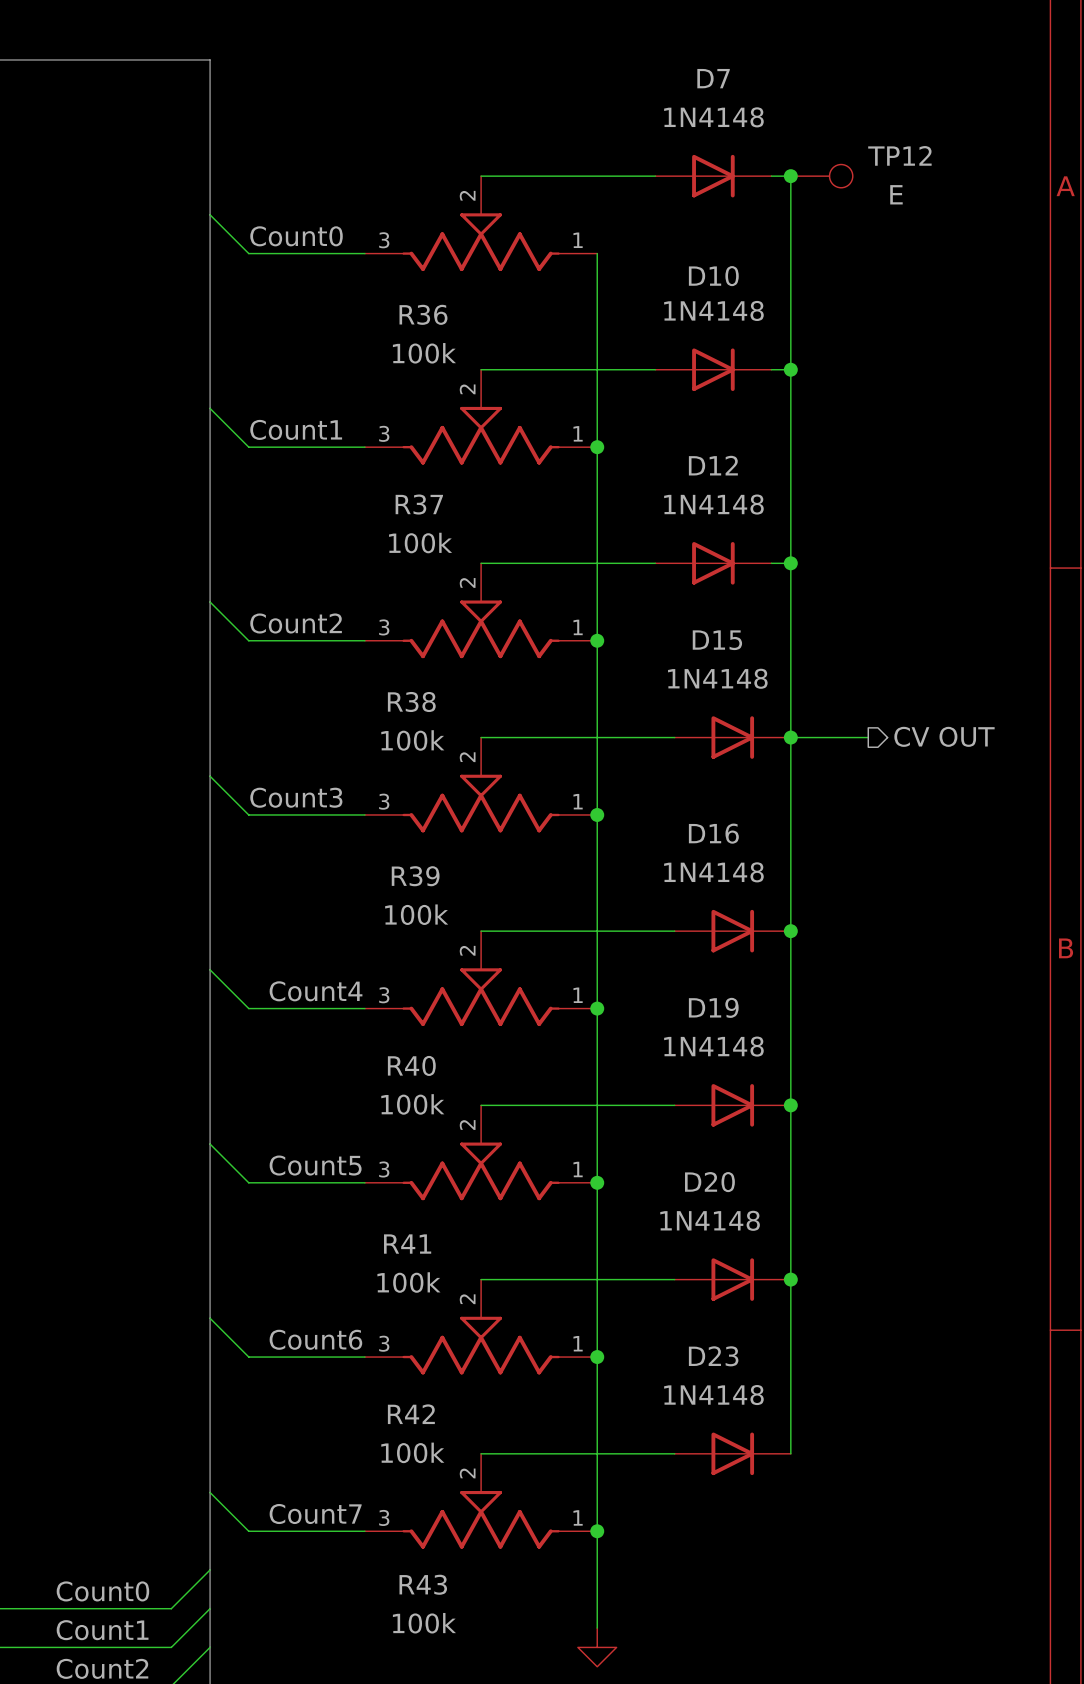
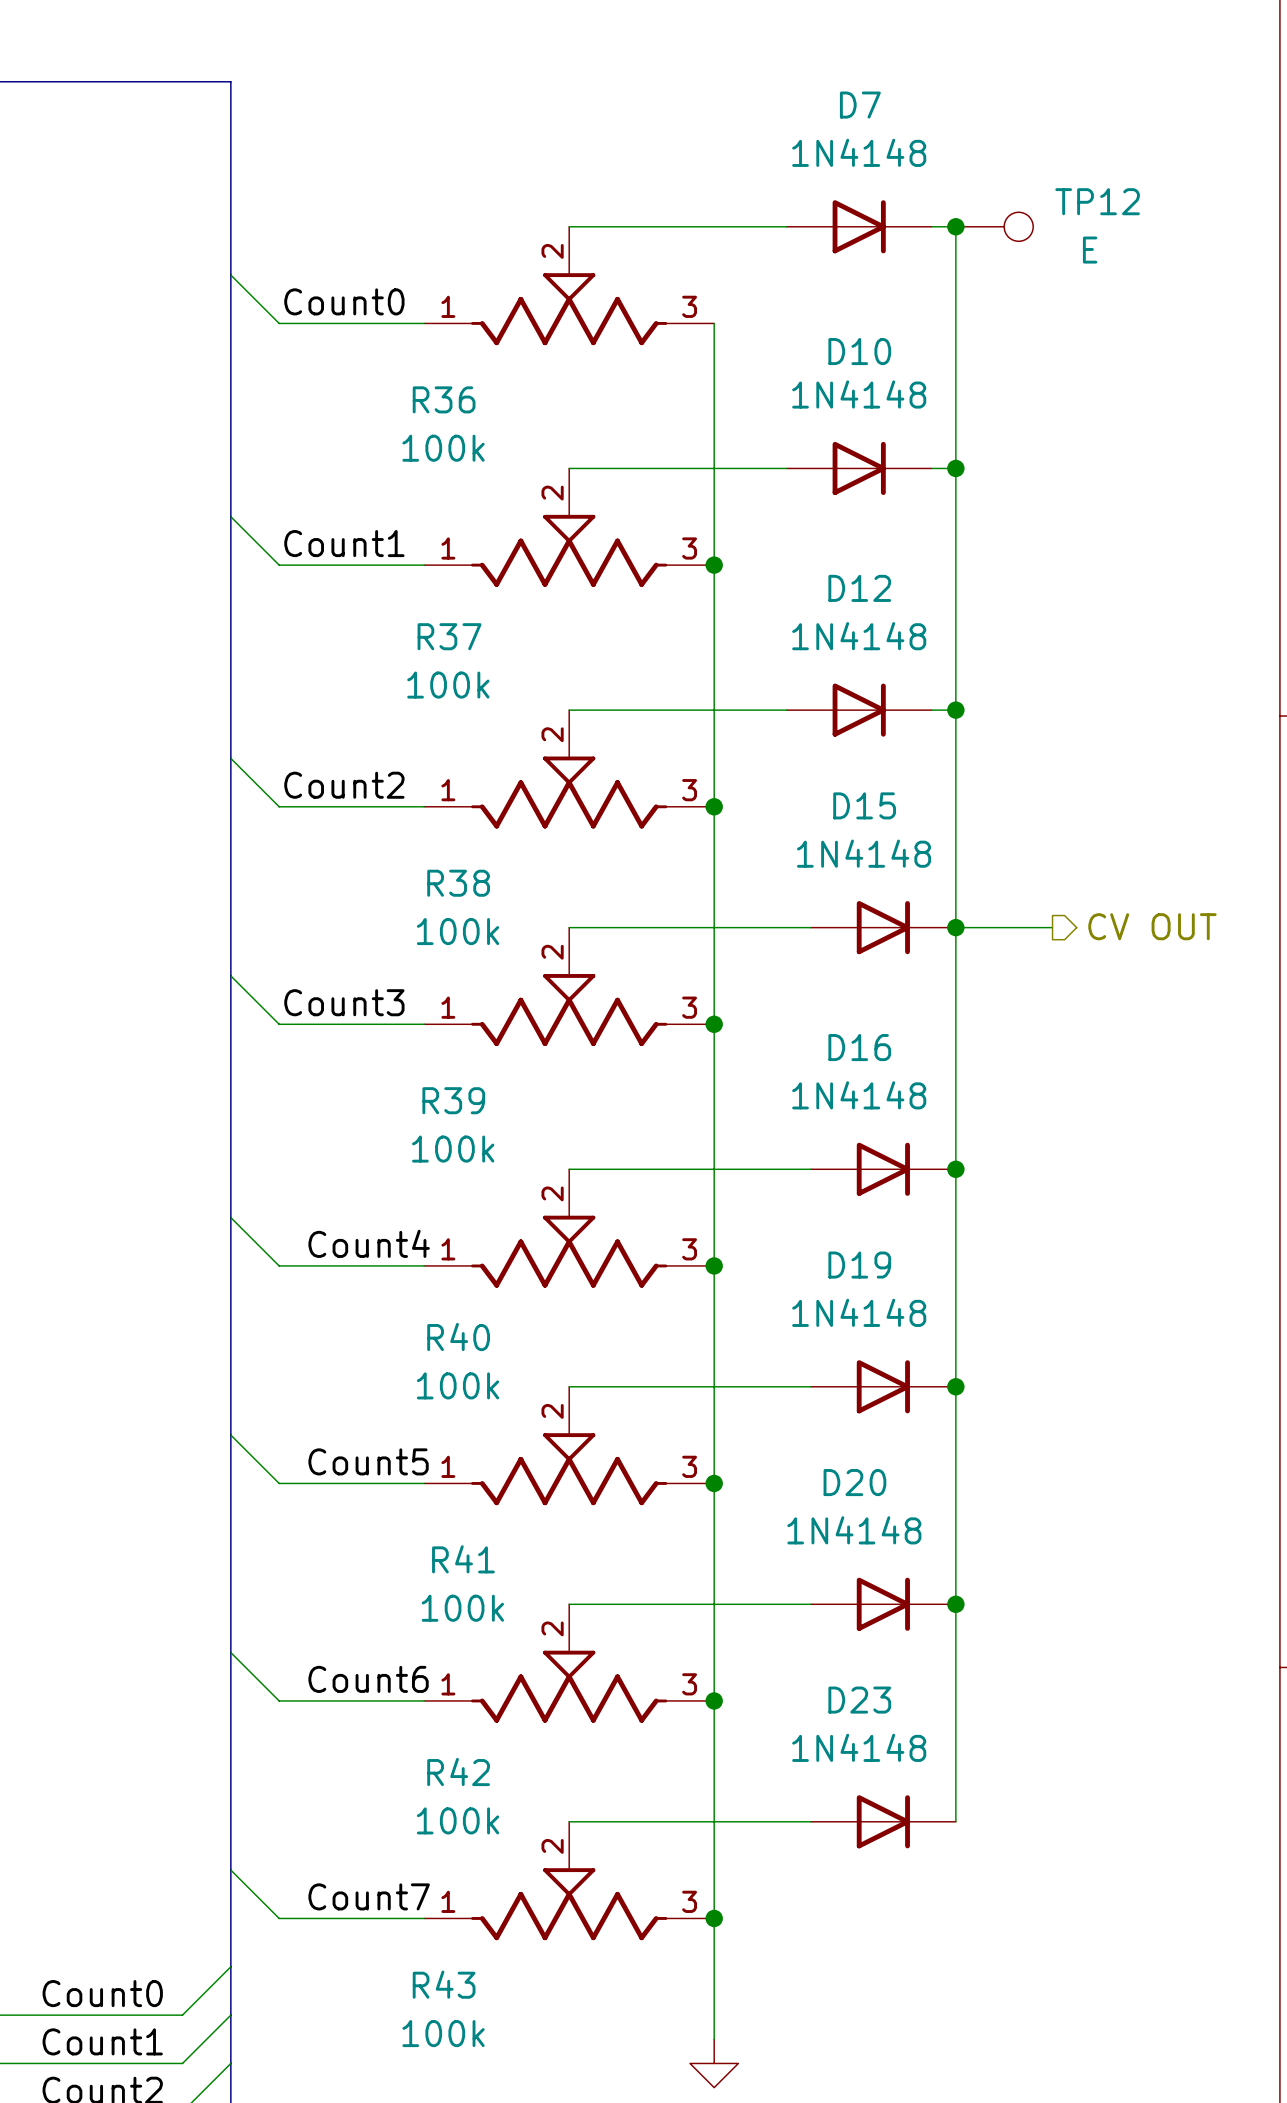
R36 flip: as is (481, 242) -> left-right (569, 309)
R36 name position: R36 (423, 314) -> R36 (444, 399)
R36 value position: 100k (424, 353) -> 100k (443, 448)
R37 flip: as is (481, 435) -> left-right (569, 550)
R37 name position: R37 (419, 504) -> R37 (449, 636)
R37 value position: 100k (420, 543) -> 100k (448, 685)
R38 flip: as is (481, 629) -> left-right (569, 792)
R39 flip: as is (481, 803) -> left-right (569, 1010)
R40 flip: as is (481, 997) -> left-right (569, 1251)
R41 flip: as is (481, 1171) -> left-right (569, 1469)
R42 flip: as is (481, 1345) -> left-right (569, 1686)
R43 flip: as is (481, 1519) -> left-right (569, 1904)
R43 name position: R43 (423, 1584) -> R43 (444, 1984)
R43 value position: 100k (424, 1623) -> 100k (443, 2033)

